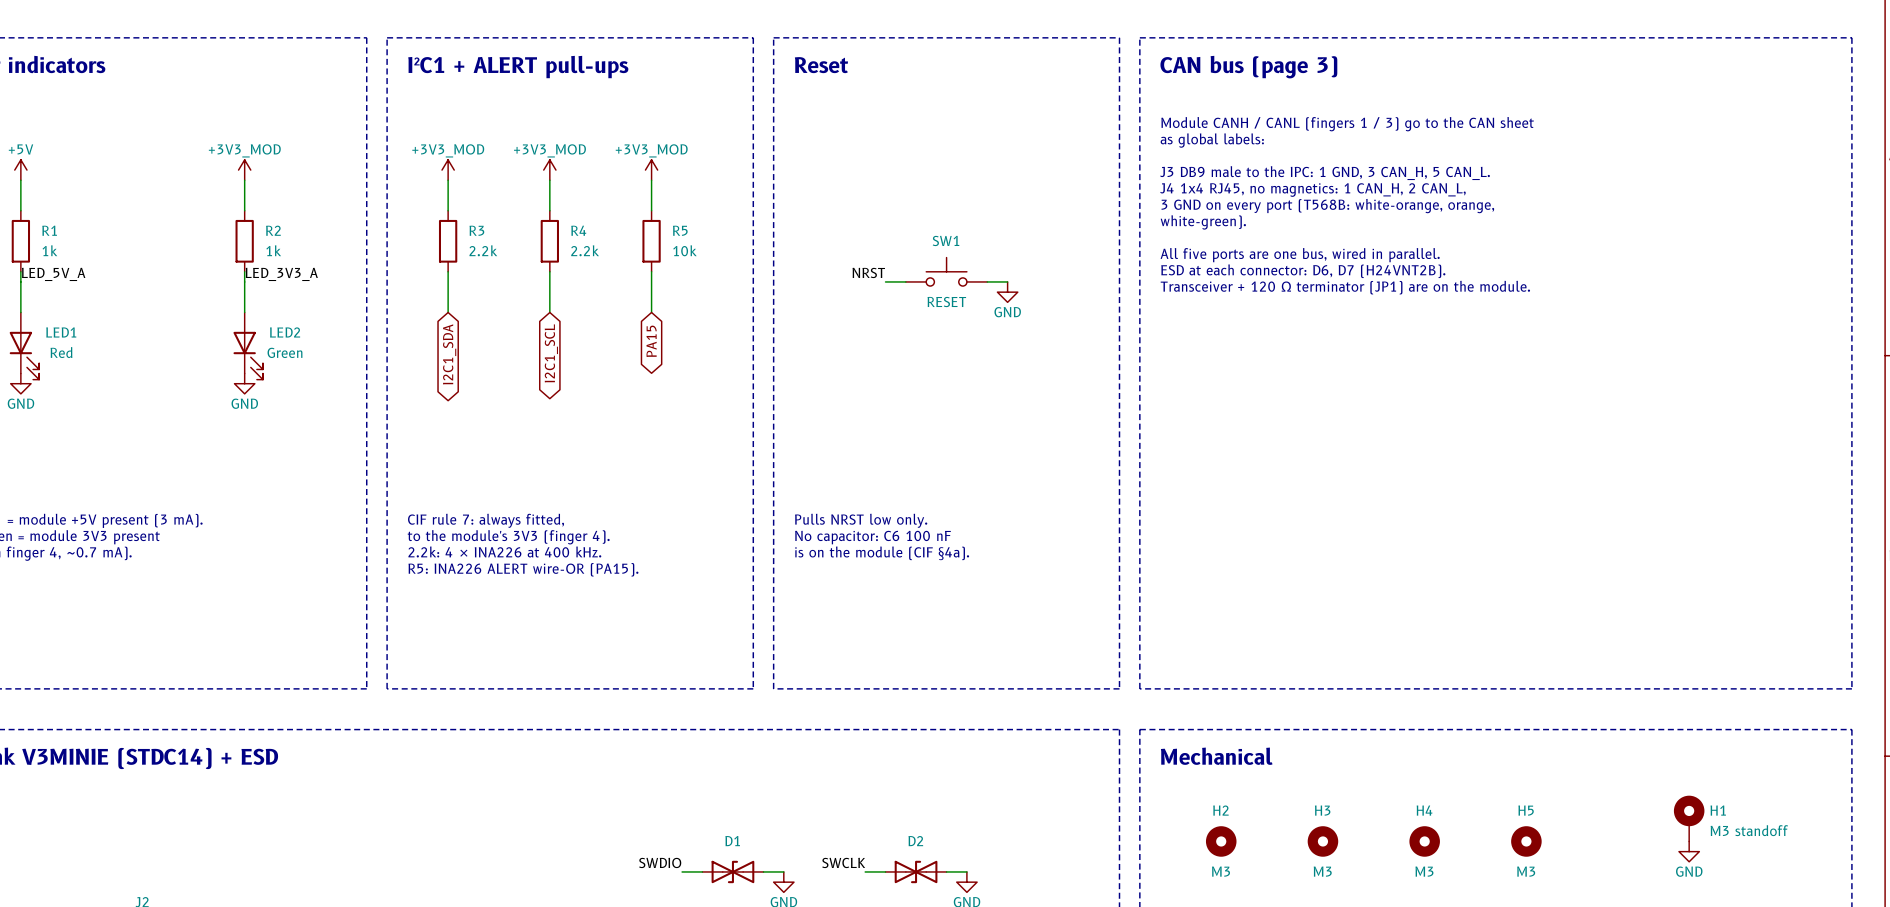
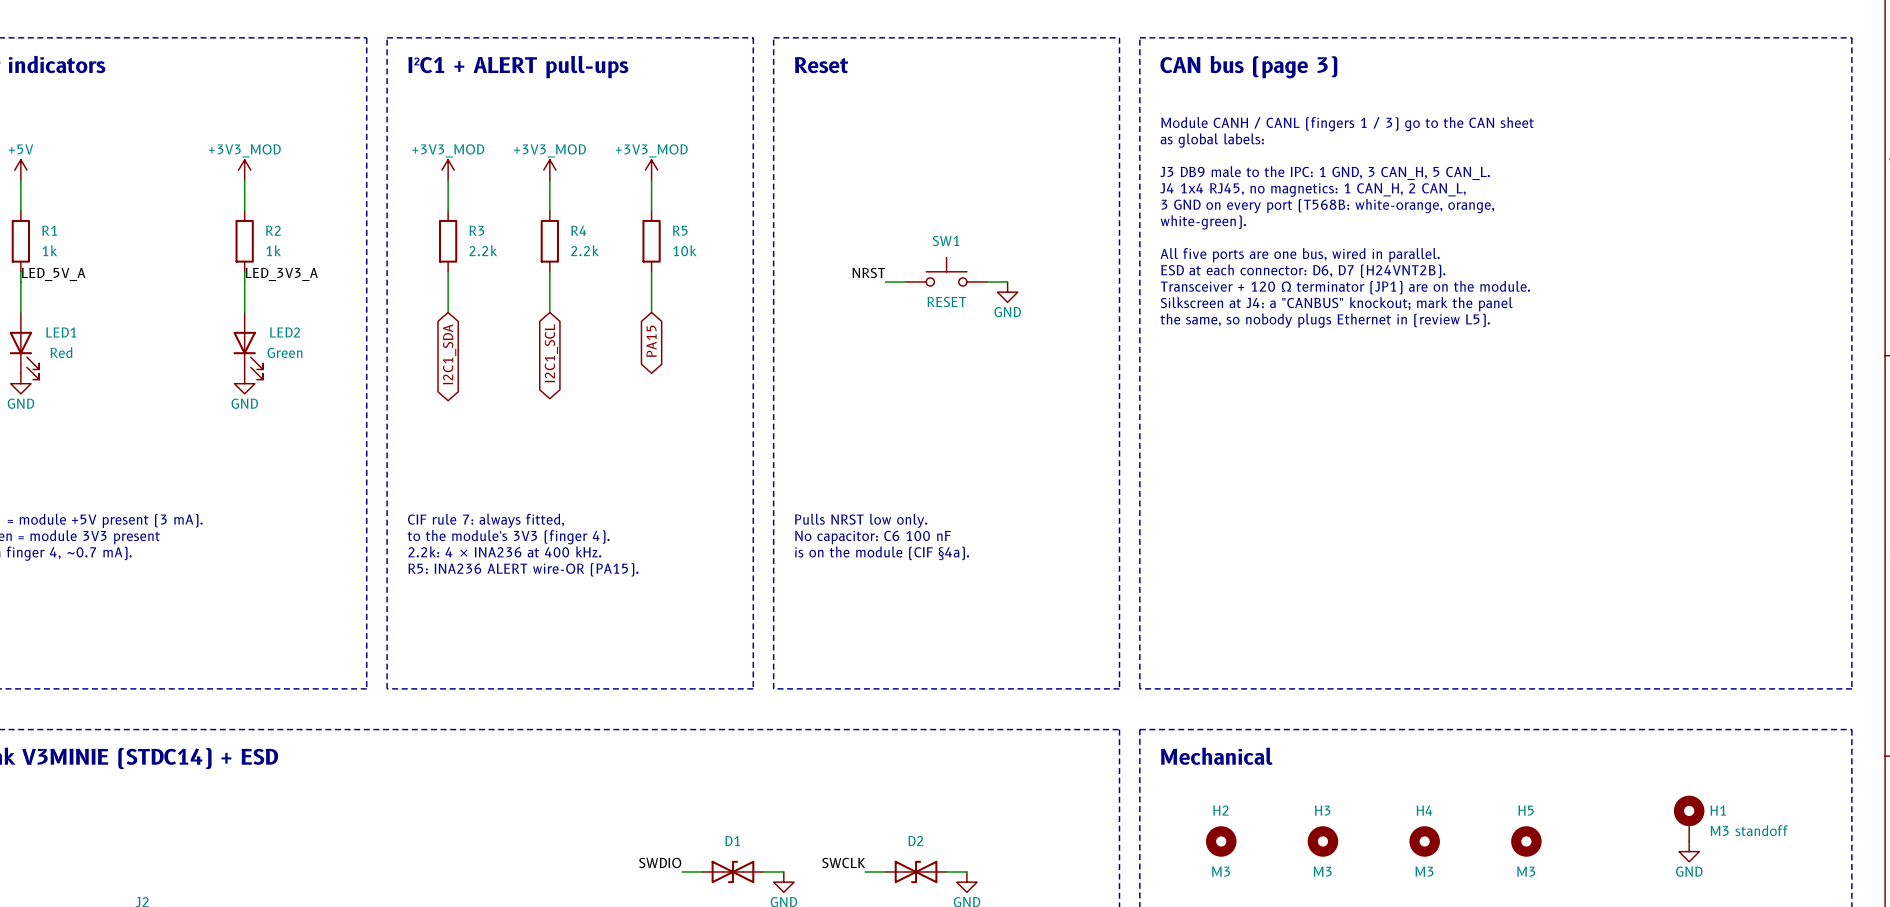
text: none -> Silkscreen at J4: a "CANBUS" knockout; mark the panel (1336, 304)
text: none -> the same, so nobody plugs Ethernet in (review L5). (1325, 320)
text: 2.2k: 4 × INA226 at 400 kHz. (504, 551) -> 2.2k: 4 × INA236 at 400 kHz. (504, 551)
text: R5: INA226 ALERT wire-OR (PA15). (523, 569) -> R5: INA236 ALERT wire-OR (PA15). (523, 569)

